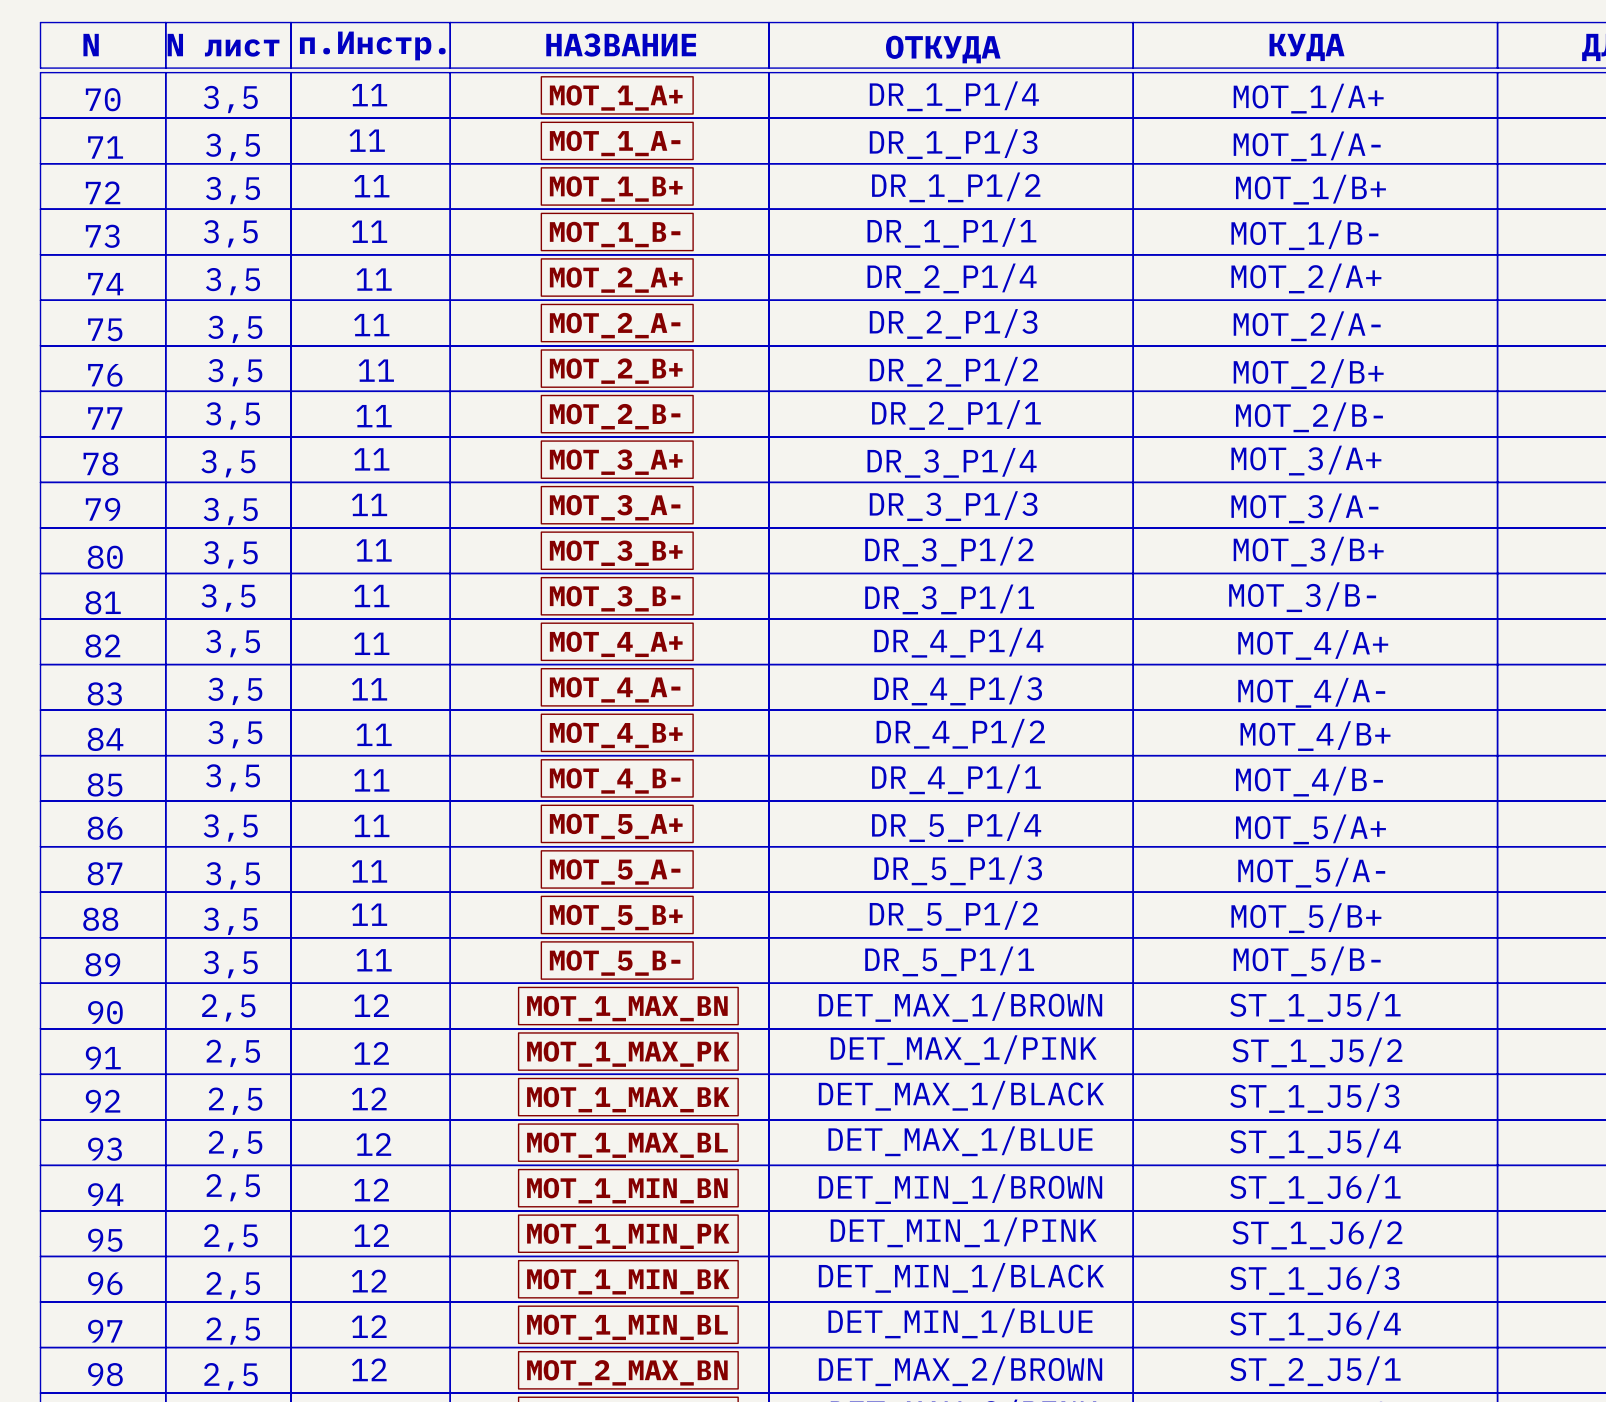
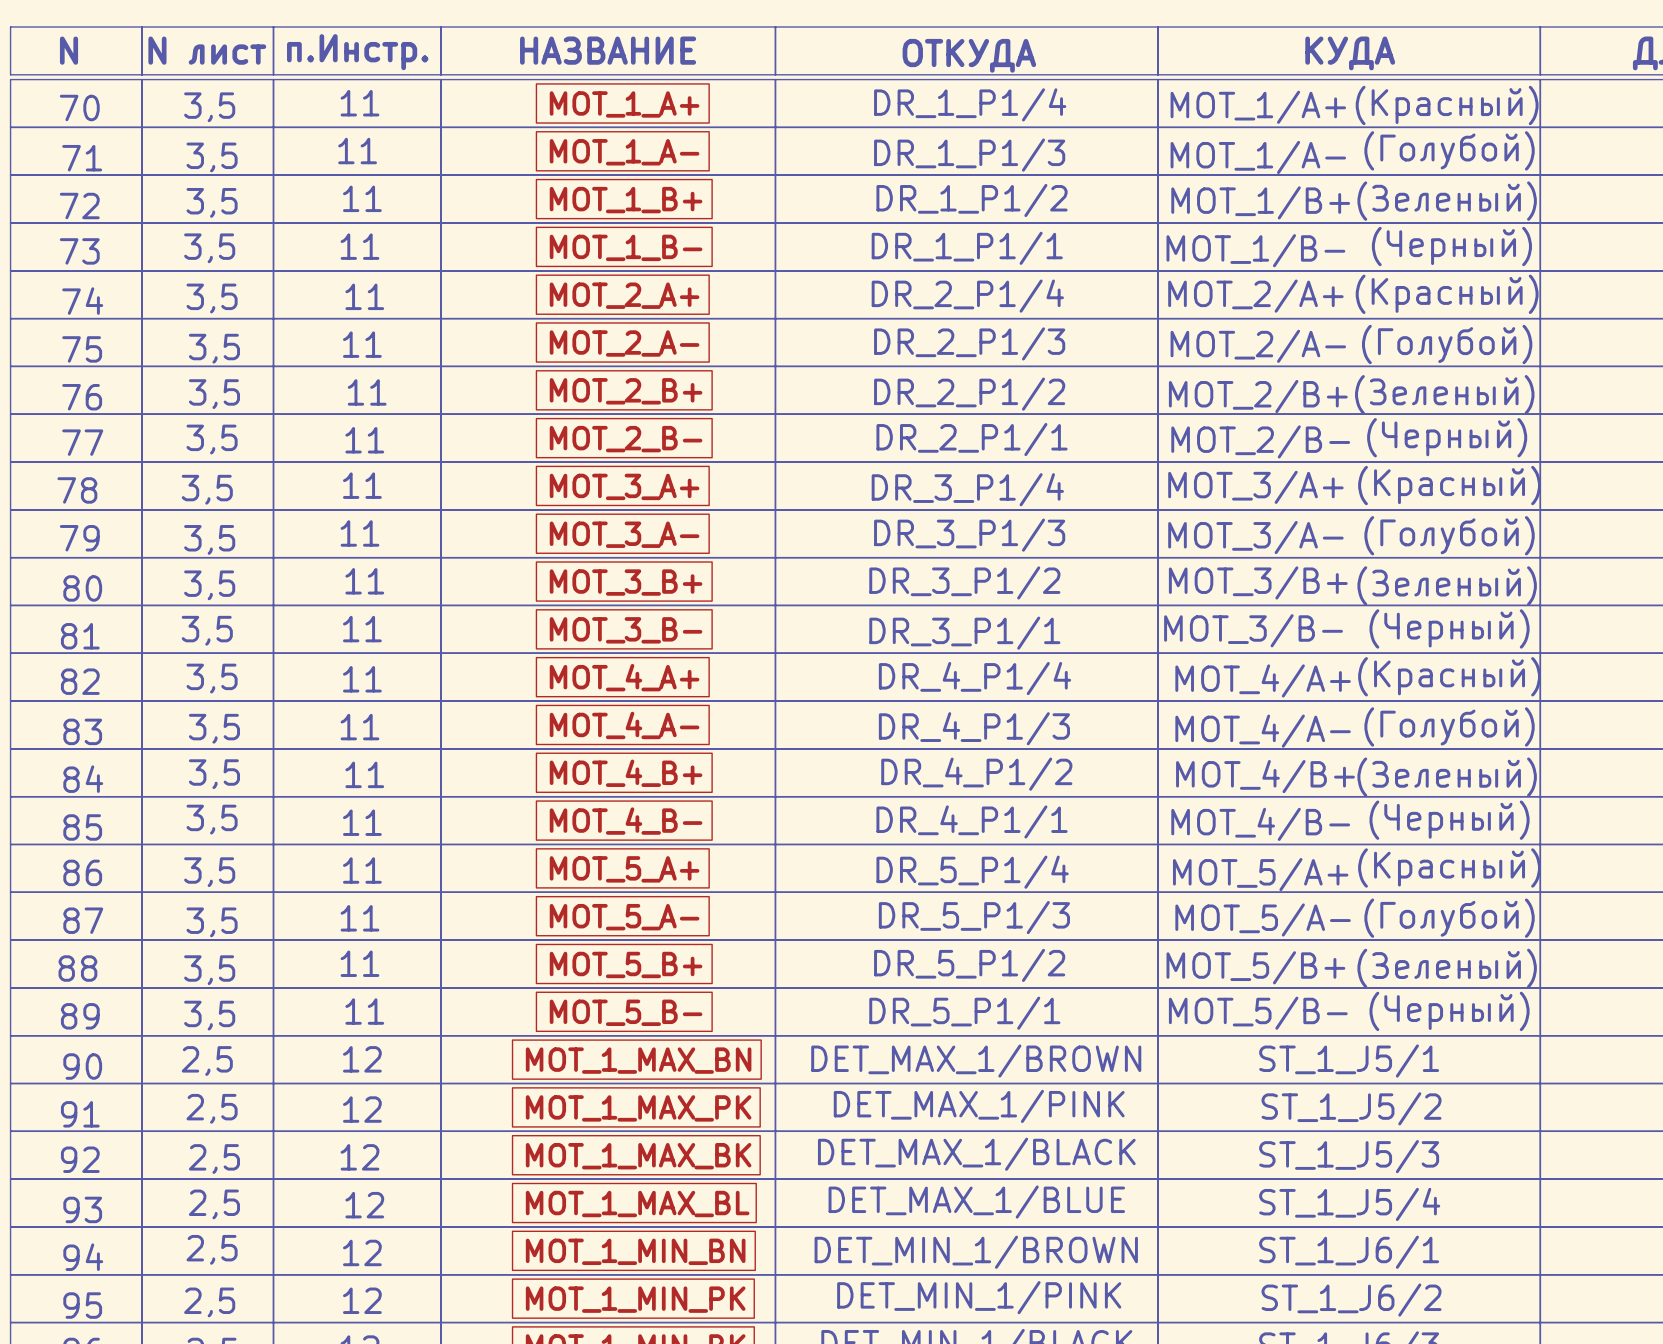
text: none -> (Красный) (1447, 105)
text position: MOT_1/A+ (1308, 98) -> MOT_1/A+ (1258, 107)
text: none -> (Голубой) (1449, 150)
text position: MOT_1/A- (1307, 146) -> MOT_1/A- (1258, 157)
text: none -> (Зеленый) (1447, 201)
text position: MOT_1/B+ (1310, 189) -> MOT_1/B+ (1260, 202)
text: none -> (Черный) (1451, 246)
text position: MOT_1/B- (1304, 235) -> MOT_1/B- (1255, 250)
text: none -> (Красный) (1447, 294)
text position: MOT_2/A+ (1306, 278) -> MOT_2/A+ (1255, 296)
text: none -> (Голубой) (1447, 344)
text position: MOT_2/A- (1307, 326) -> MOT_2/A- (1258, 346)
text: none -> (Зеленый) (1444, 394)
text position: MOT_2/B+ (1308, 374) -> MOT_2/B+ (1258, 396)
text: none -> (Черный) (1447, 437)
text position: MOT_2/B- (1309, 417) -> MOT_2/B- (1260, 441)
text: none -> (Красный) (1449, 485)
text position: MOT_3/A+ (1306, 460) -> MOT_3/A+ (1255, 487)
text: none -> (Голубой) (1449, 535)
text position: MOT_3/A- (1304, 508) -> MOT_3/A- (1255, 537)
text position: MOT_3/B+ (1308, 551) -> MOT_3/B+ (1258, 582)
text: none -> (Зеленый) (1447, 585)
text: none -> (Черный) (1449, 628)
text position: MOT_3/B- (1302, 597) -> MOT_3/B- (1253, 630)
text: none -> (Красный) (1449, 676)
text position: MOT_4/A+ (1313, 644) -> MOT_4/A+ (1263, 680)
text: none -> (Голубой) (1449, 726)
text position: MOT_4/A- (1311, 692) -> MOT_4/A- (1263, 731)
text: none -> (Зеленый) (1447, 777)
text position: MOT_4/B+ (1315, 736) -> MOT_4/B+ (1265, 776)
text: none -> (Черный) (1449, 820)
text position: MOT_4/B- (1309, 781) -> MOT_4/B- (1260, 824)
text: none -> (Красный) (1449, 867)
text position: MOT_5/A+ (1310, 829) -> MOT_5/A+ (1260, 874)
text: none -> (Голубой) (1449, 918)
text position: MOT_5/A- (1311, 872) -> MOT_5/A- (1263, 919)
text: none -> (Зеленый) (1447, 968)
text position: MOT_5/B+ (1306, 918) -> MOT_5/B+ (1255, 967)
text: none -> (Черный) (1449, 1011)
text position: MOT_5/B- (1307, 961) -> MOT_5/B- (1258, 1013)

